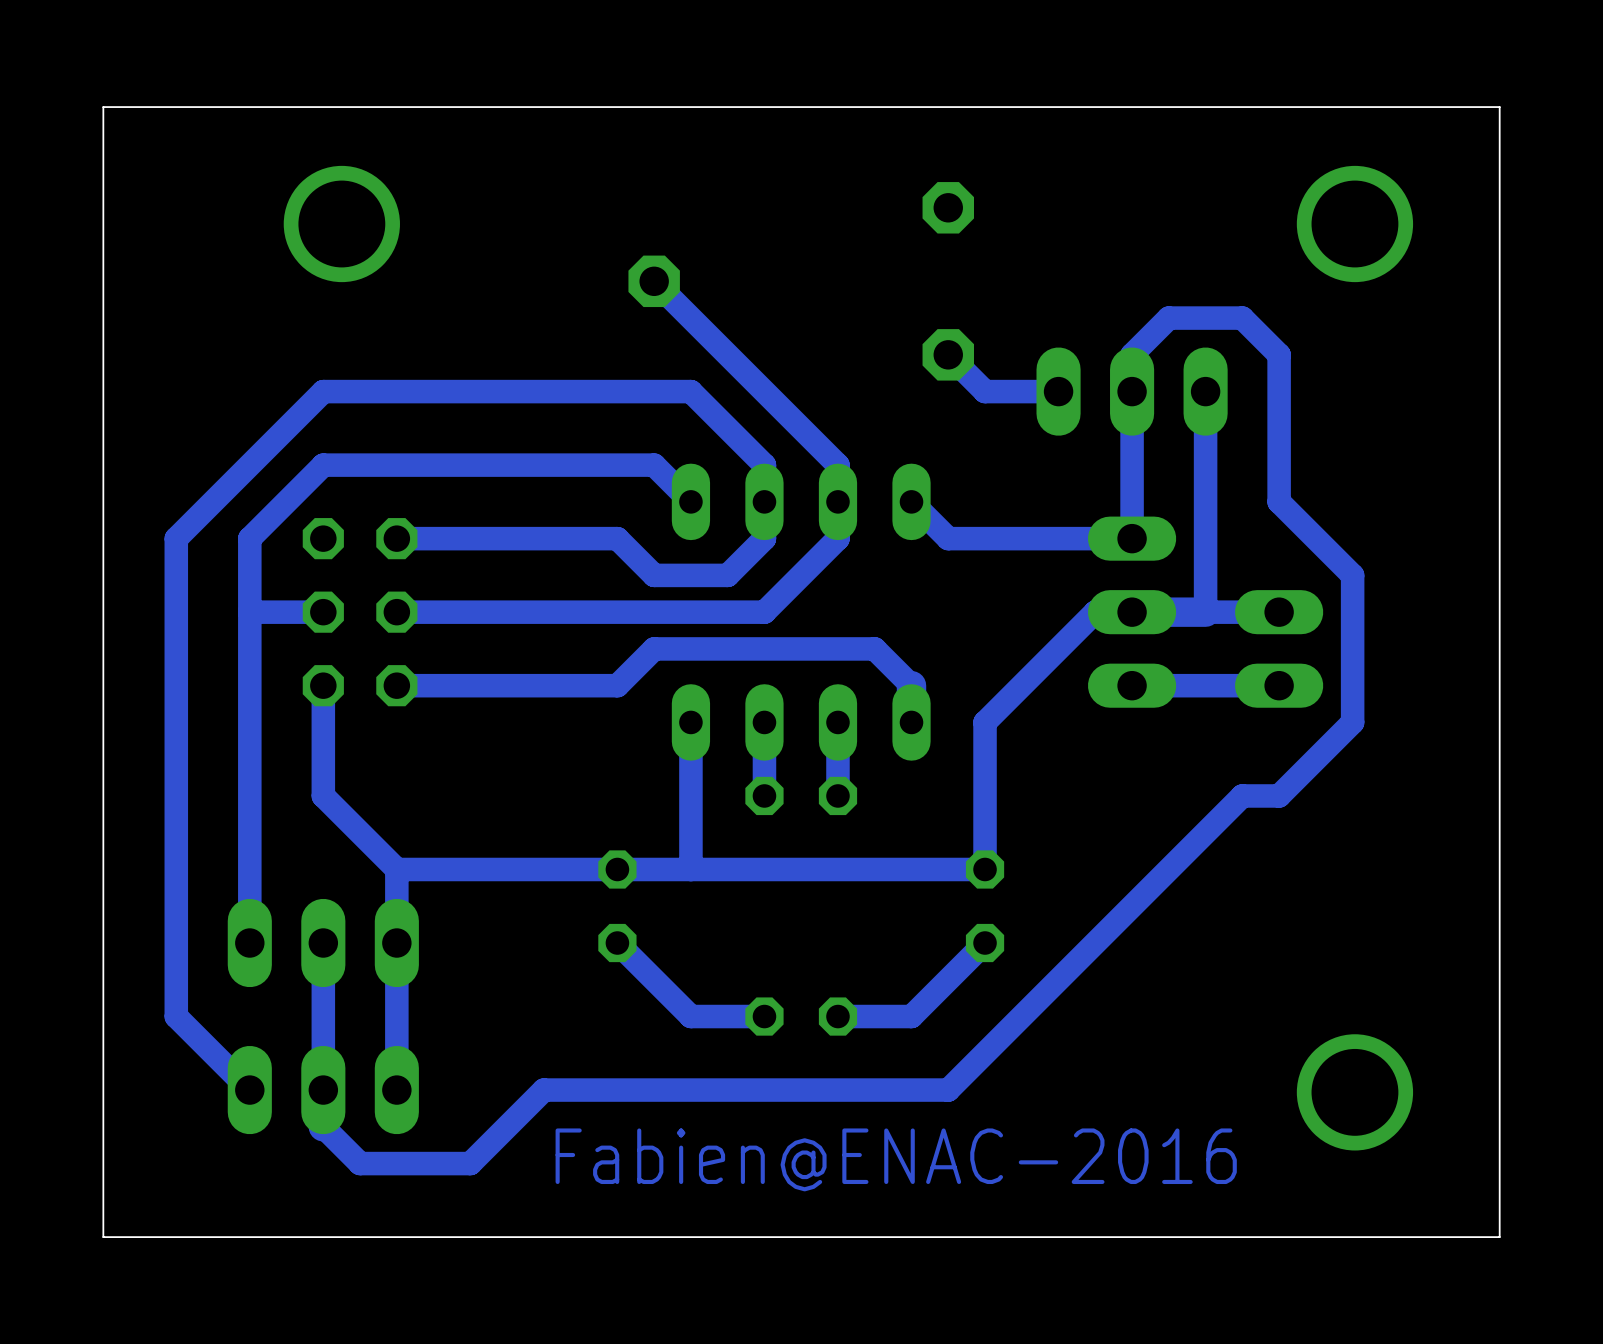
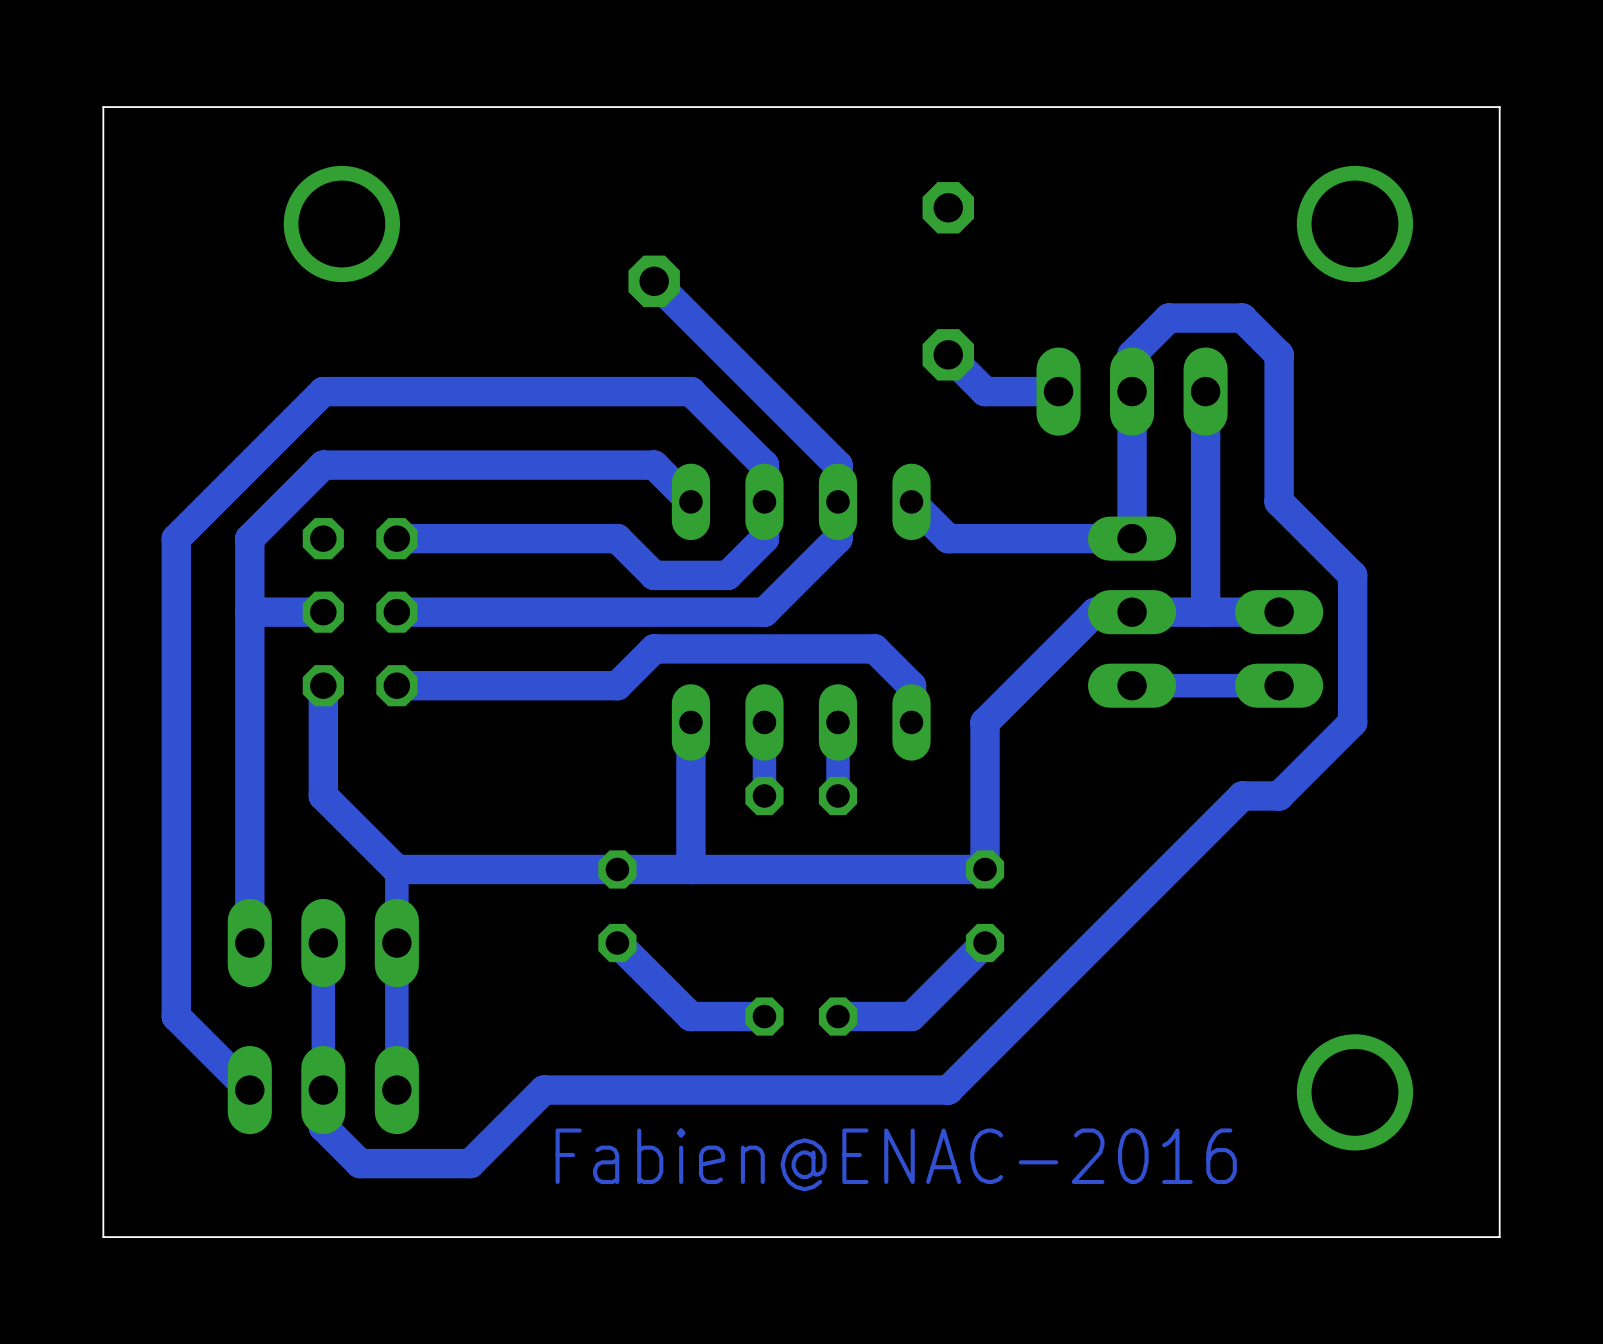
track width: thin (654, 281) (837, 465) (837, 538) (764, 612) (396, 612) -> thick (654, 281) (837, 465) (837, 538) (764, 612) (396, 612)
track width: thin (948, 354) (985, 391) (1058, 391) -> thick (948, 354) (985, 391) (1058, 391)
track width: thin (1205, 391) (1205, 612) (1279, 612) -> thick (1205, 391) (1205, 612) (1279, 612)
track width: thin (690, 501) (654, 465) (323, 465) (249, 538) (249, 943) -> thick (690, 501) (654, 465) (323, 465) (249, 538) (249, 943)
track width: thin (911, 501) (948, 538) (1132, 538) (1132, 354) (1168, 318) (1242, 318) (1279, 354) (1279, 501) (1352, 575) (1352, 722) (1279, 795) (1242, 795) (948, 1090) (543, 1090) (470, 1163) (360, 1163) (323, 1126) -> thick (911, 501) (948, 538) (1132, 538) (1132, 354) (1168, 318) (1242, 318) (1279, 354) (1279, 501) (1352, 575) (1352, 722) (1279, 795) (1242, 795) (948, 1090) (543, 1090) (470, 1163) (360, 1163) (323, 1126)
track width: thin (396, 538) (617, 538) (654, 575) (727, 575) (764, 538) (764, 465) (690, 391) (323, 391) (176, 538) (176, 1016) (249, 1090) -> thick (396, 538) (617, 538) (654, 575) (727, 575) (764, 538) (764, 465) (690, 391) (323, 391) (176, 538) (176, 1016) (249, 1090)
track width: thin (323, 612) (249, 612) -> thick (323, 612) (249, 612)
track width: thin (1132, 612) (1095, 612) (985, 722) (985, 869) (396, 869) (323, 795) (323, 685) -> thick (1132, 612) (1095, 612) (985, 722) (985, 869) (396, 869) (323, 795) (323, 685)
track width: thin (911, 685) (874, 648) (654, 648) (617, 685) (396, 685) -> thick (911, 685) (874, 648) (654, 648) (617, 685) (396, 685)
track width: thin (690, 722) (690, 869) -> thick (690, 722) (690, 869)
track width: thin (617, 943) (690, 1016) (764, 1016) -> thick (617, 943) (690, 1016) (764, 1016)
track width: thin (985, 943) (911, 1016) (837, 1016) -> thick (985, 943) (911, 1016) (837, 1016)

